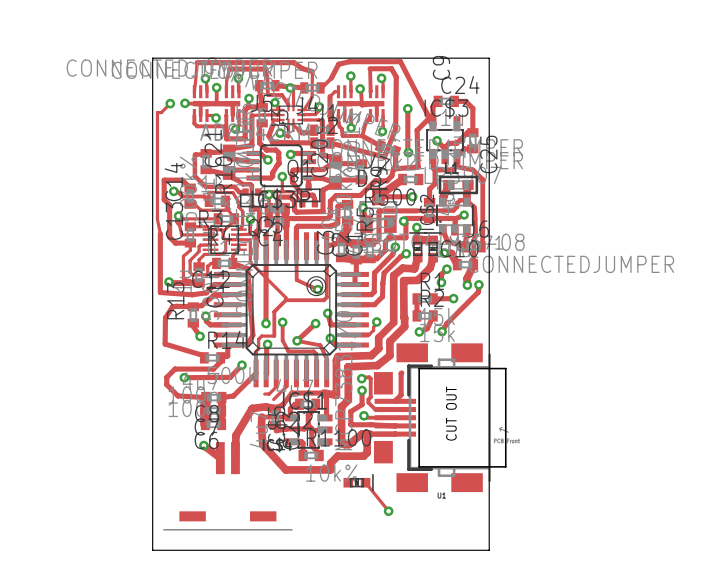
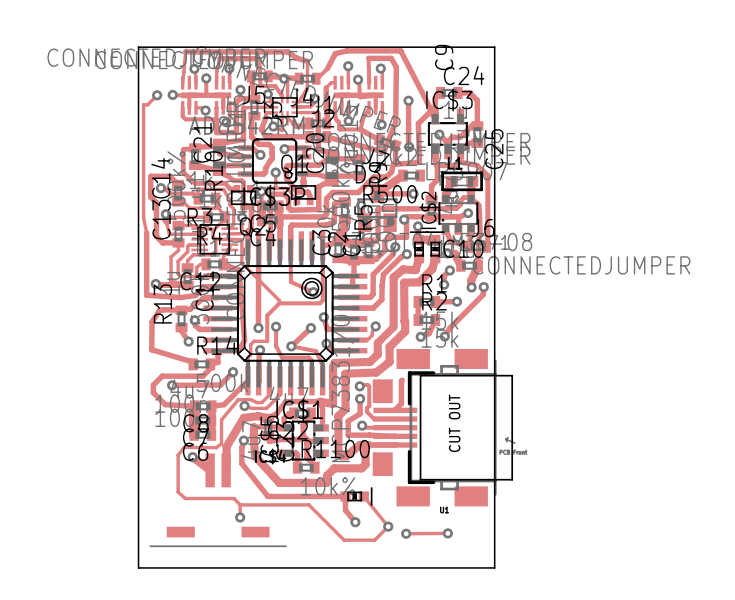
track: none -> (257, 402) (250, 399) (238, 399) (221, 419) (221, 443) (216, 447) (184, 447) (178, 455) (178, 492) (185, 498) (234, 498) (240, 504)
track: none -> (244, 406) (252, 408) (266, 408)
via: none -> (244, 406)
track: none -> (243, 440) (241, 463) (267, 496) (345, 496) (345, 510) (355, 522)
via: none -> (243, 440)
track: none -> (240, 504) (240, 517)
track: none -> (240, 504) (308, 504) (344, 540) (374, 540) (388, 526)
via: none -> (240, 517)
via: none -> (355, 522)
via: none -> (406, 533)
track: none -> (447, 533) (406, 533)
via: none -> (447, 533)

